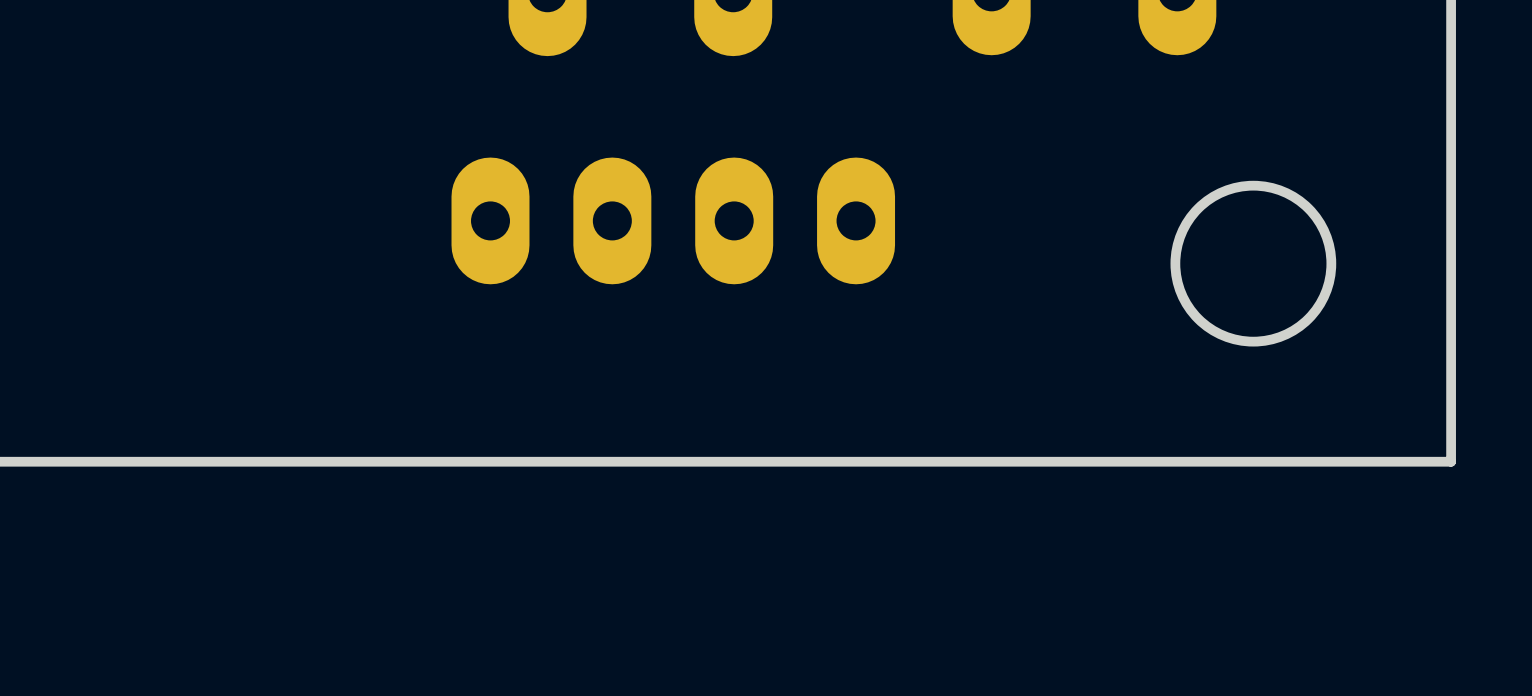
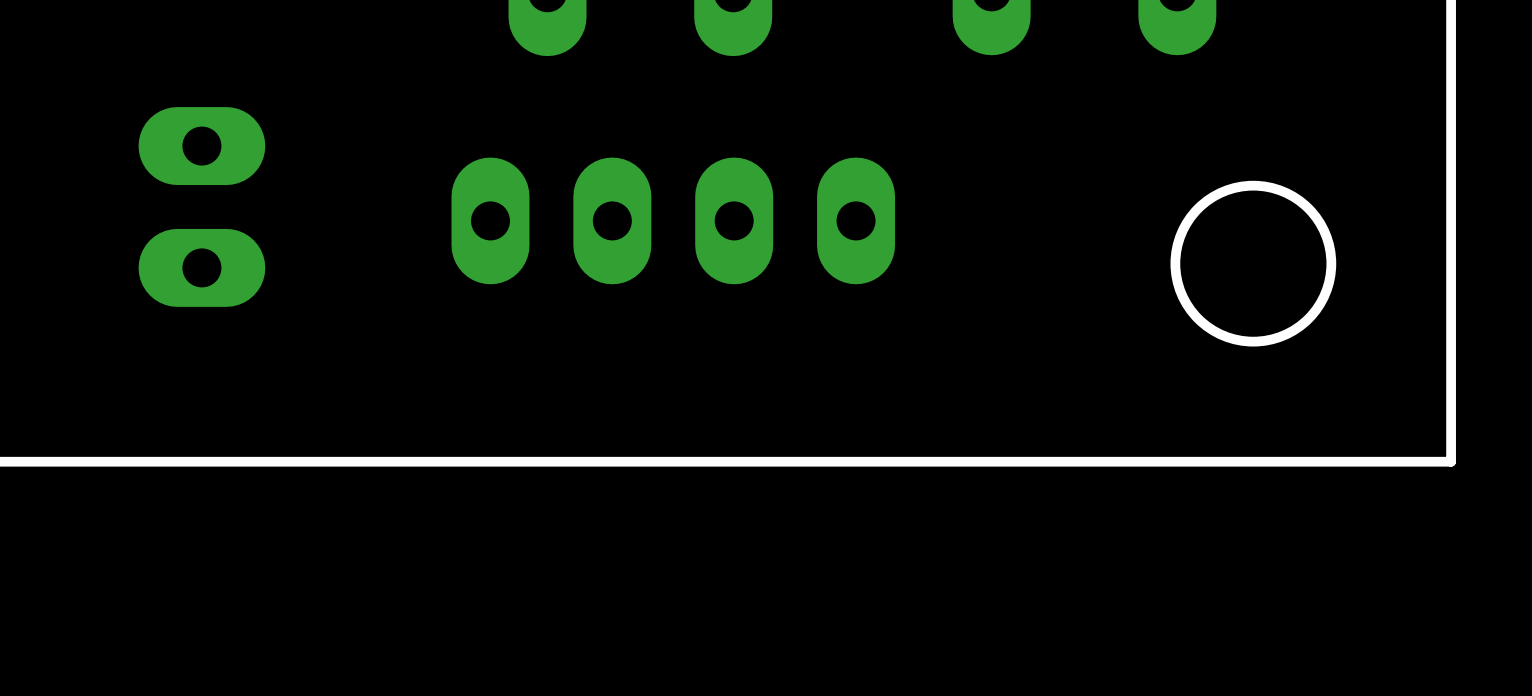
part: none -> (201, 206)

